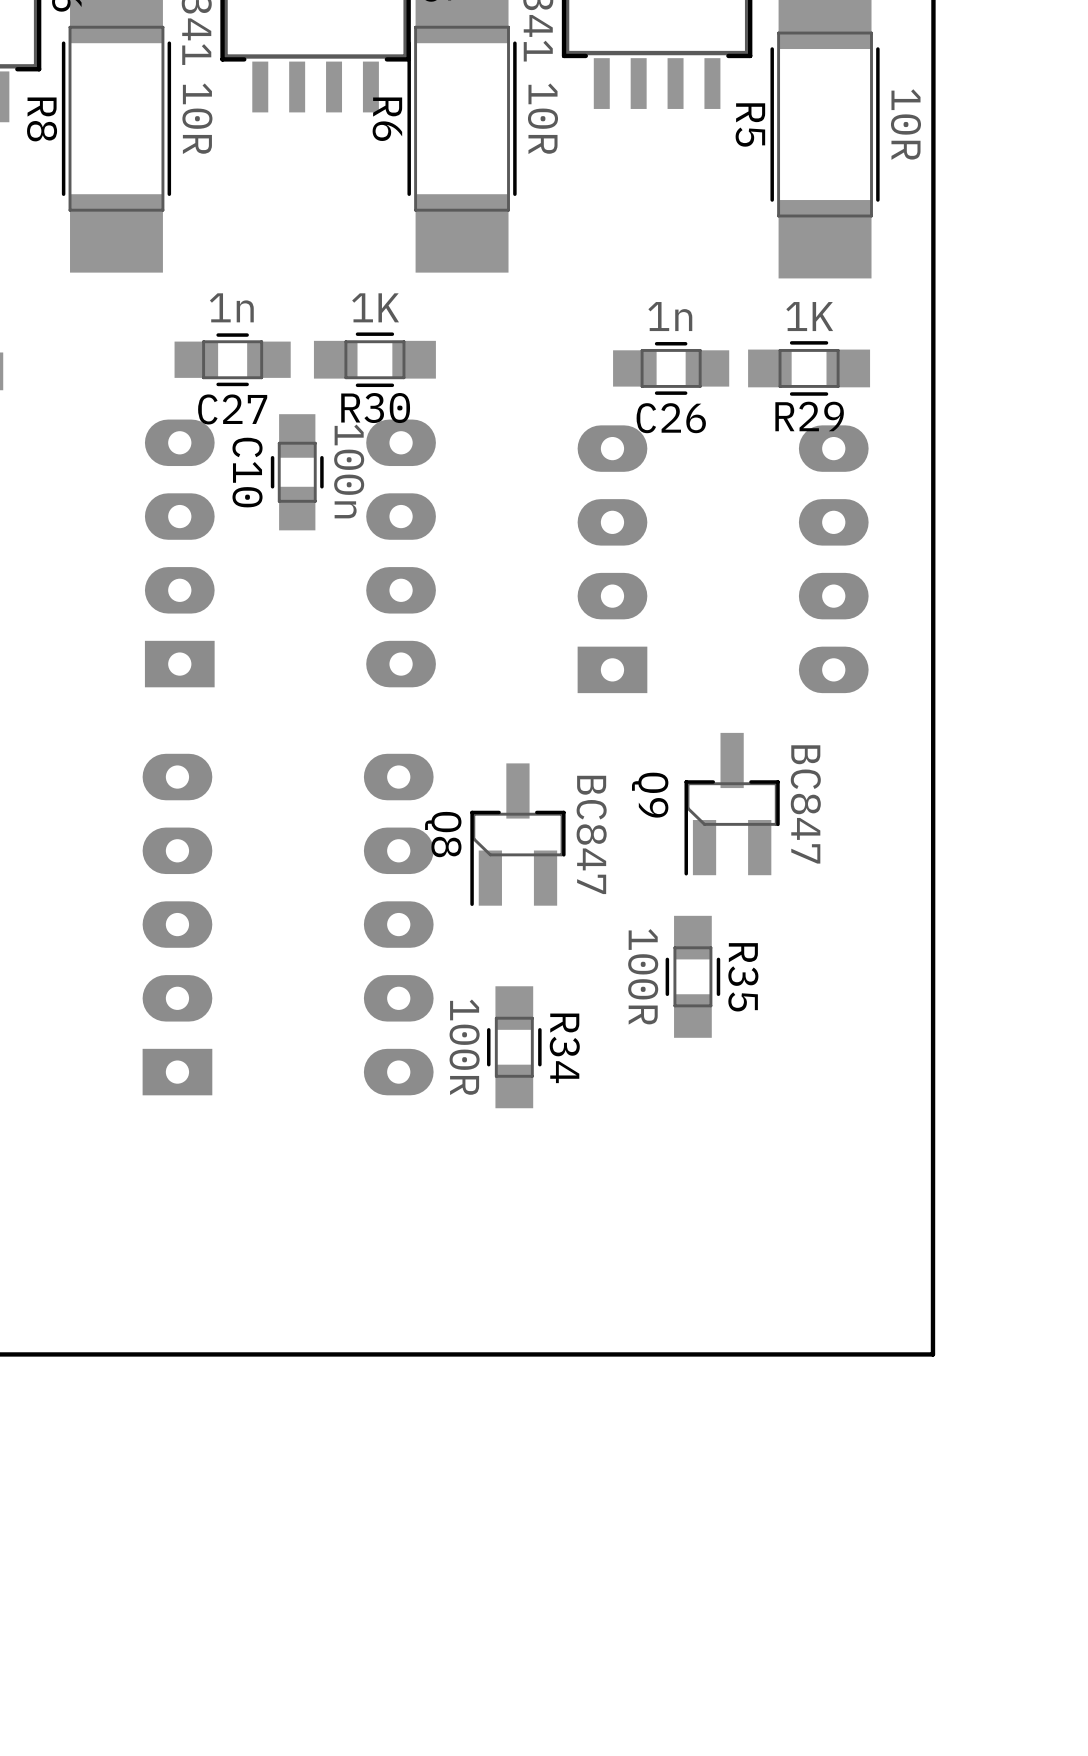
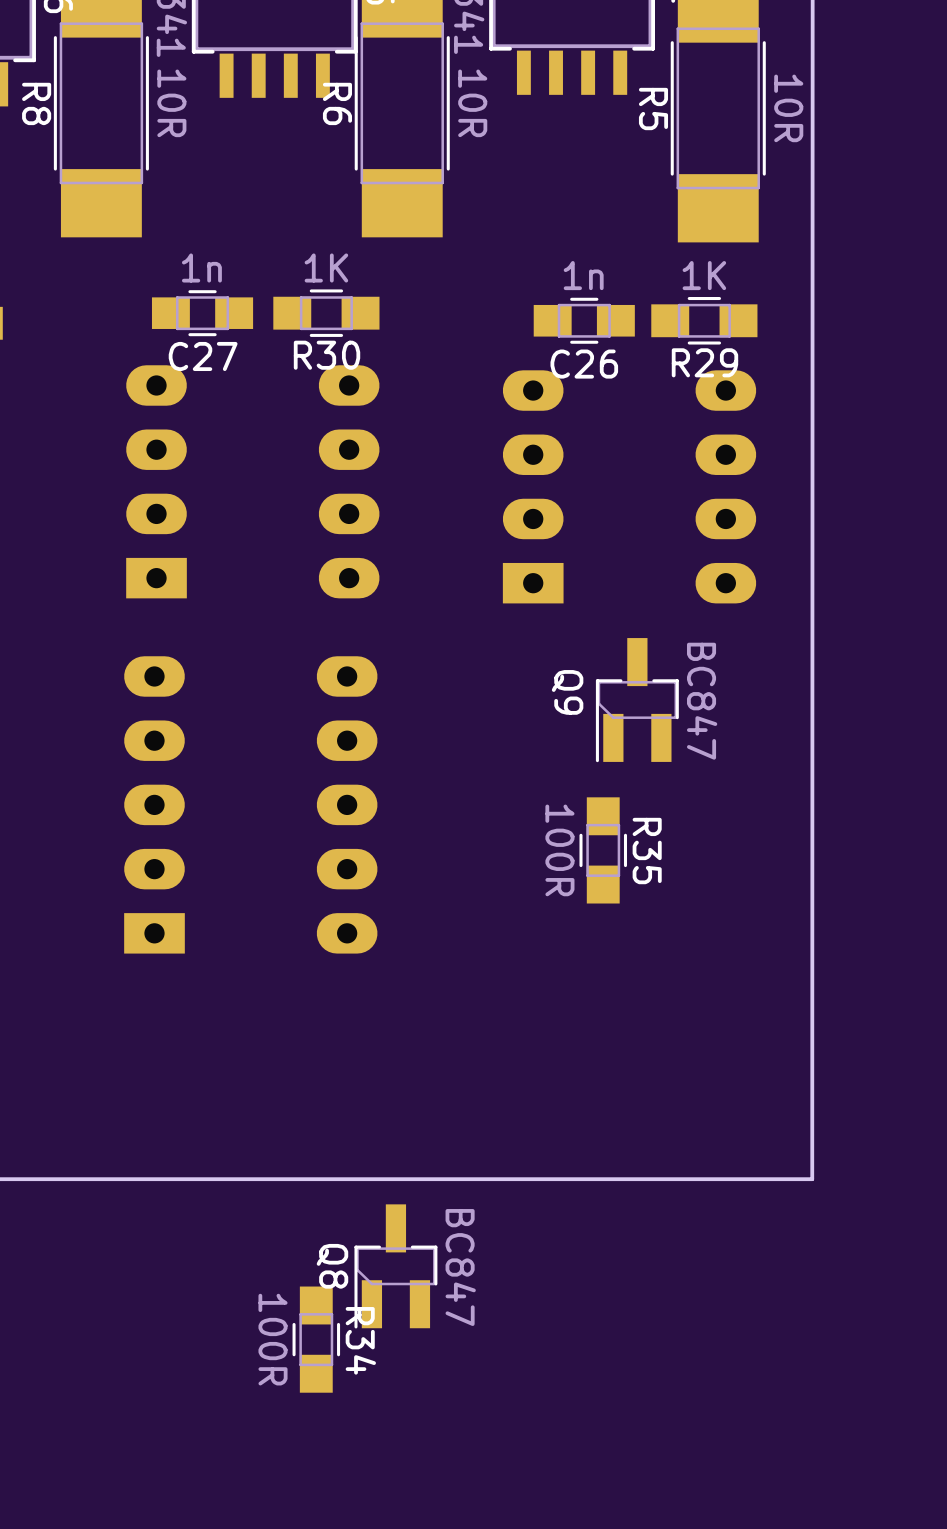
C10: 100n (297, 472) -> none
Q8 position: (517, 834) -> (395, 1266)
R34 position: (514, 1047) -> (316, 1339)

